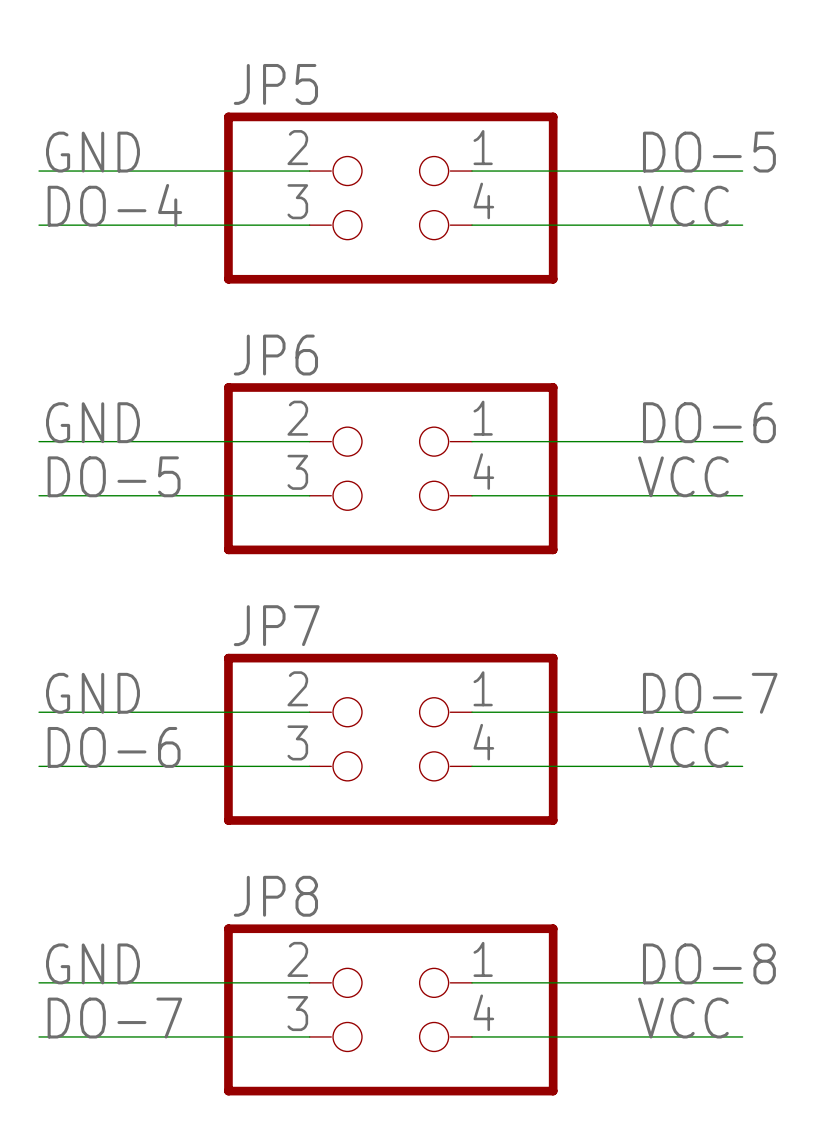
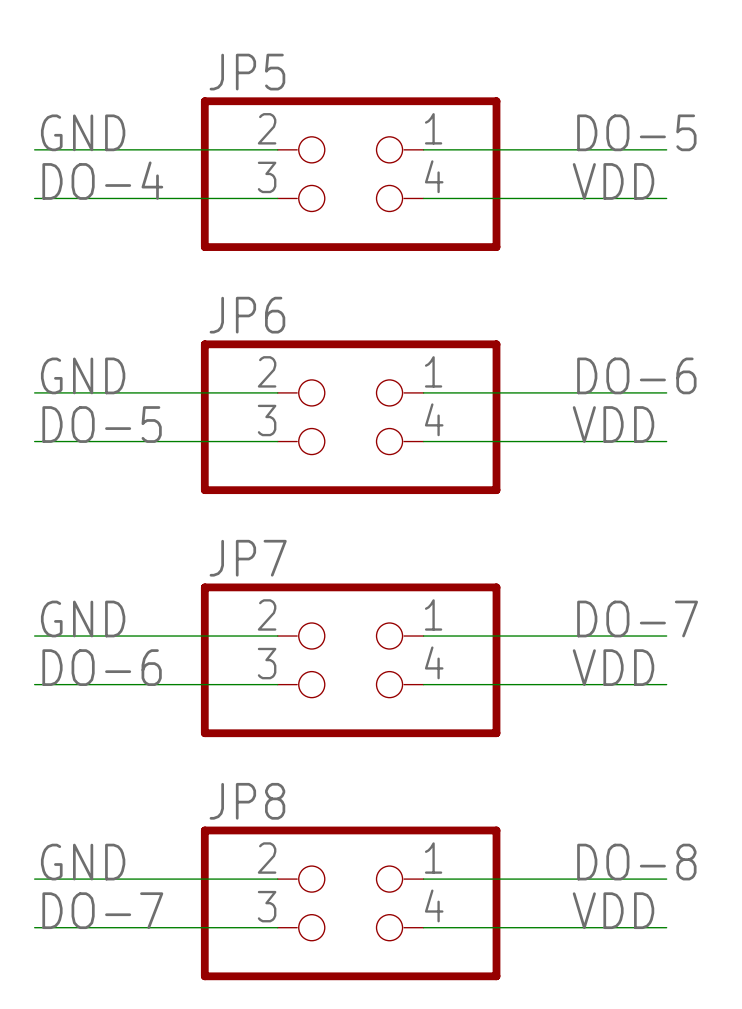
label: VCC (683, 206) -> VDD (613, 181)
label: VCC (683, 476) -> VDD (613, 424)
label: VCC (683, 747) -> VDD (613, 667)
label: VCC (683, 1018) -> VDD (613, 910)

